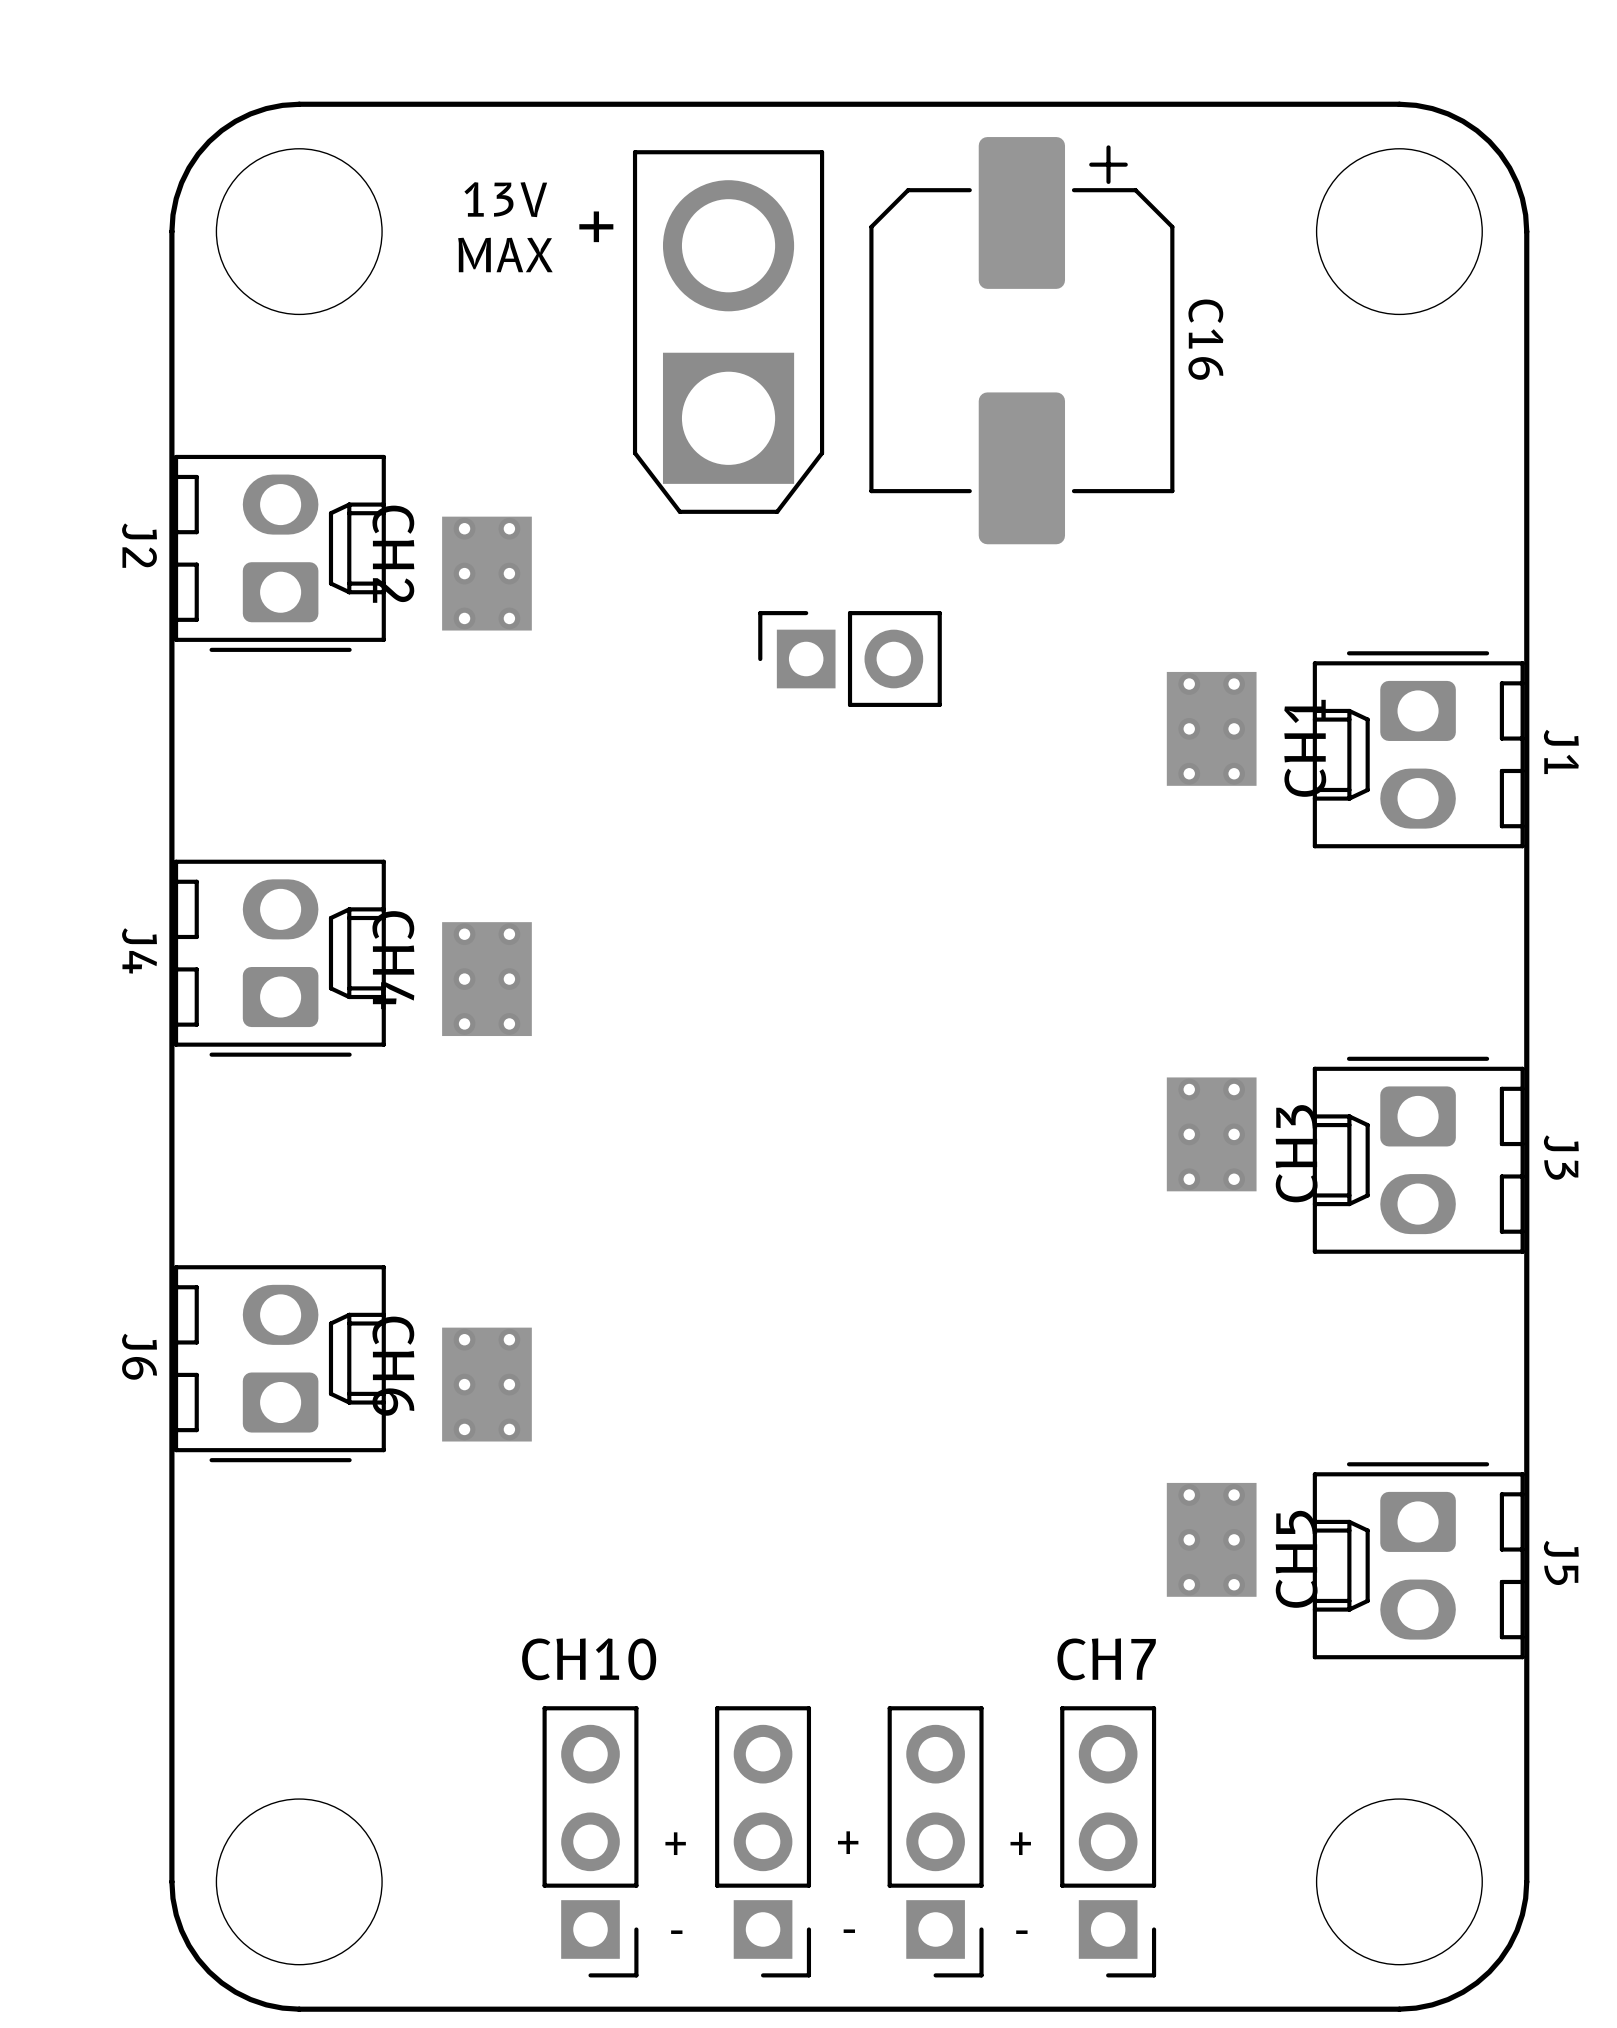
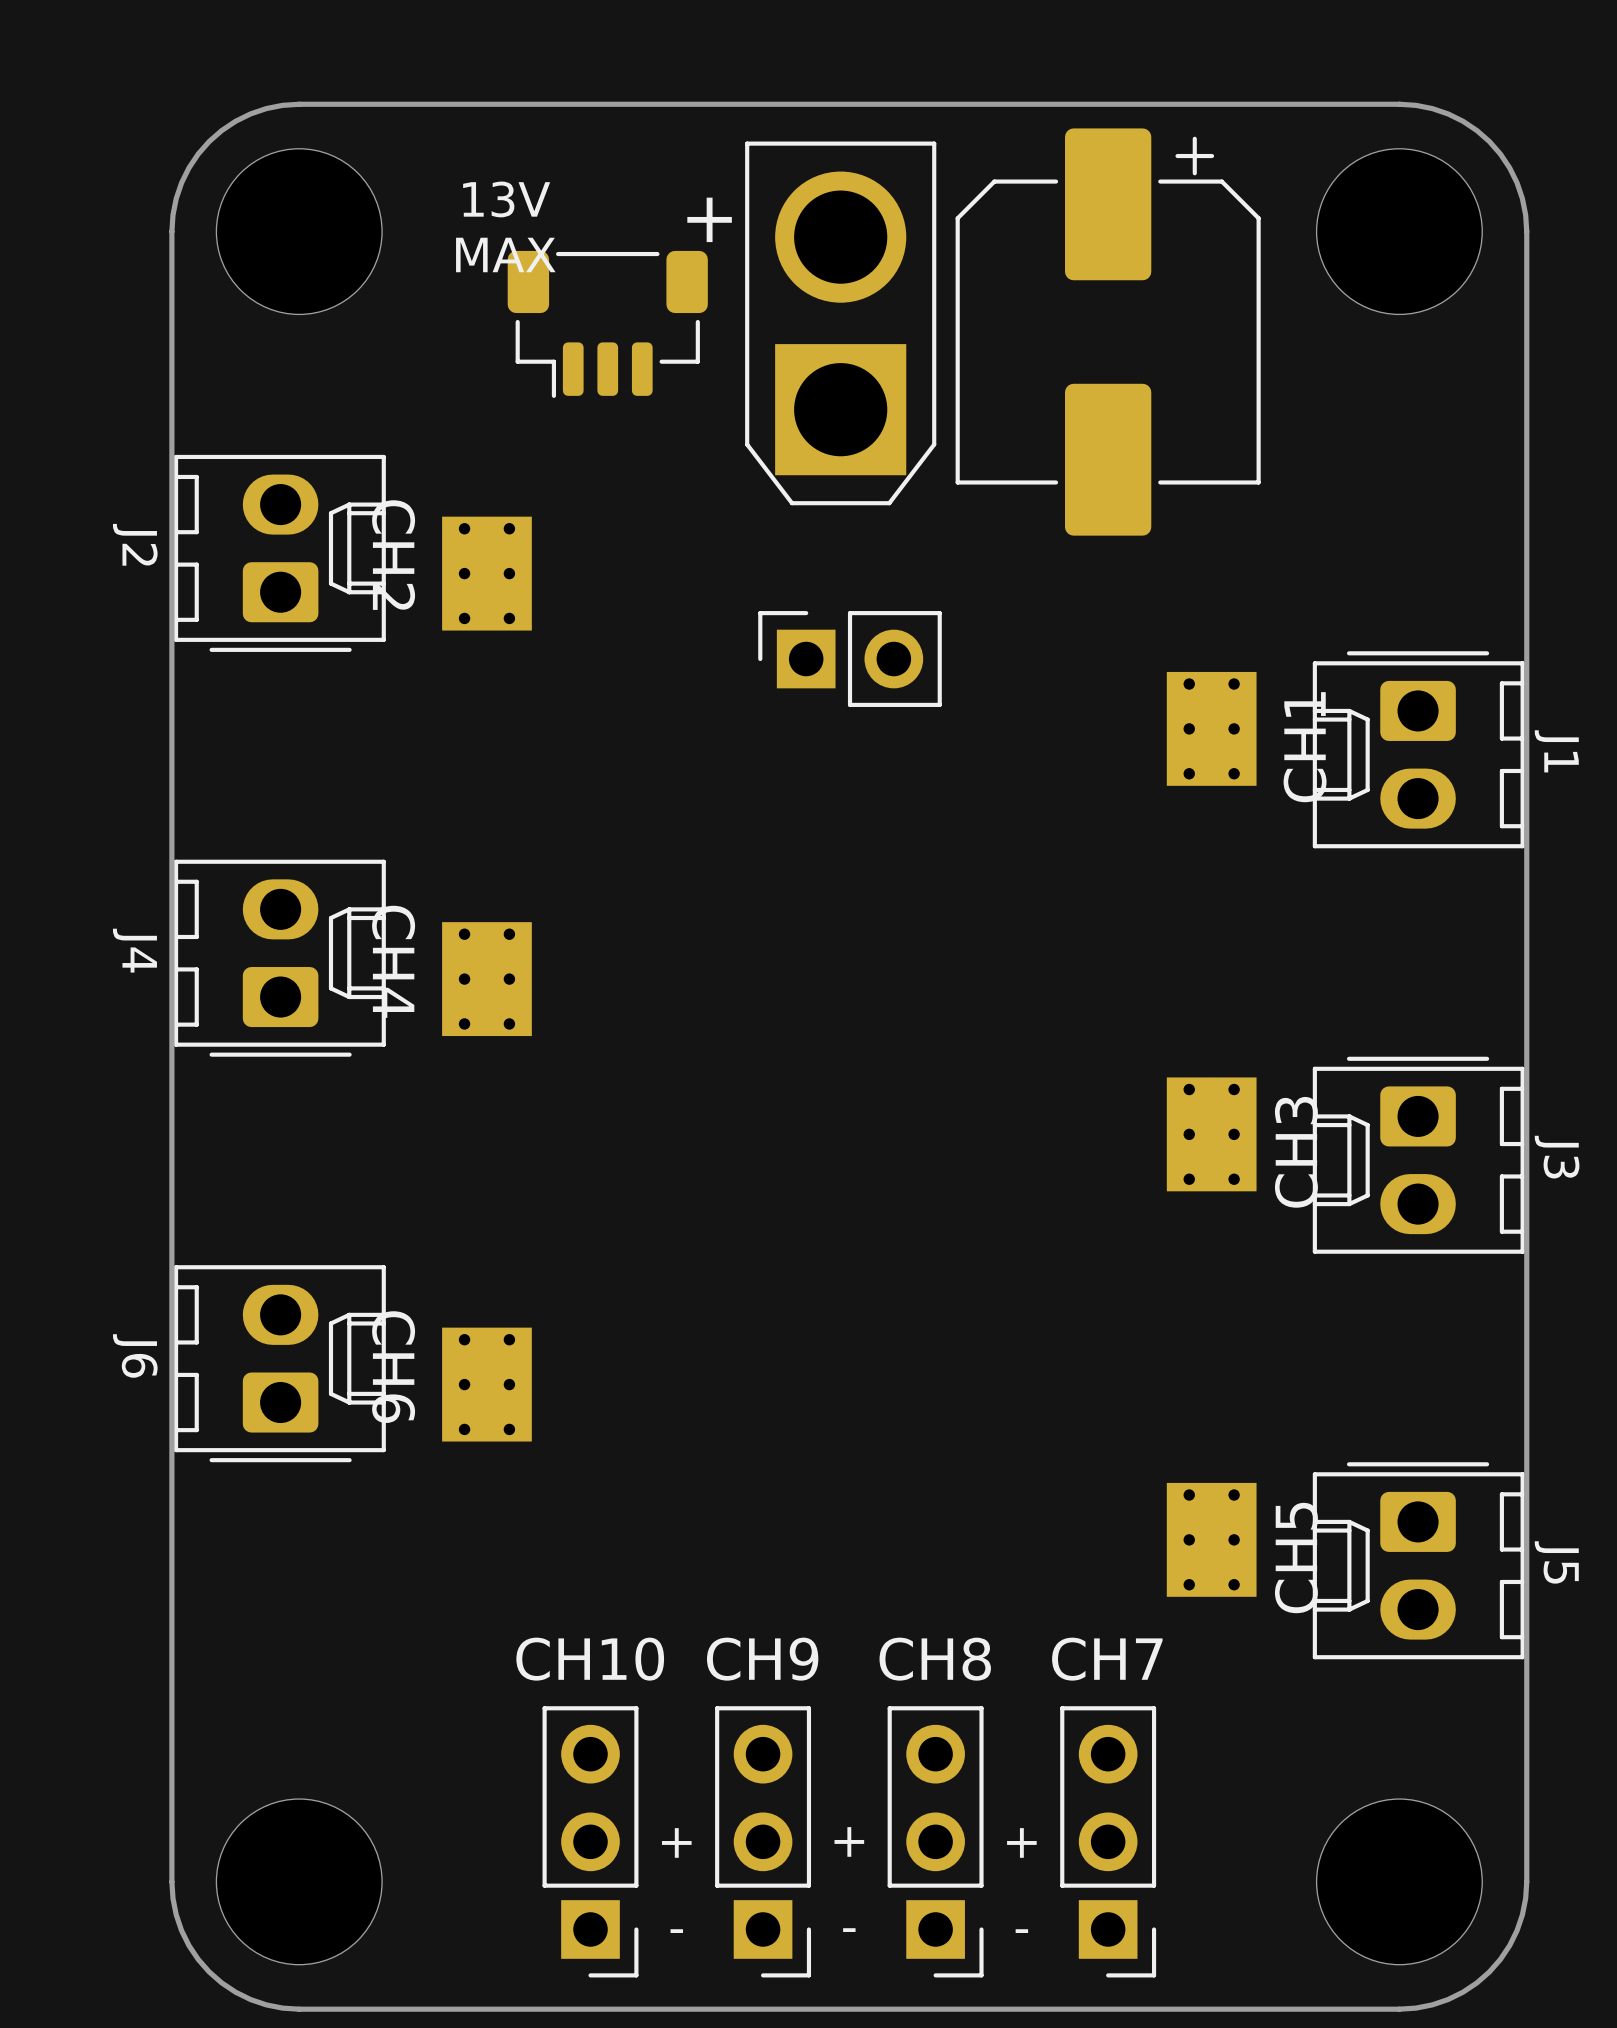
part: none -> (607, 324)
part position: (728, 332) -> (840, 323)
part: none -> (1108, 332)
C16: (1021, 340) -> none
text: none -> CH9 (762, 1659)
text: none -> CH8 (935, 1659)

